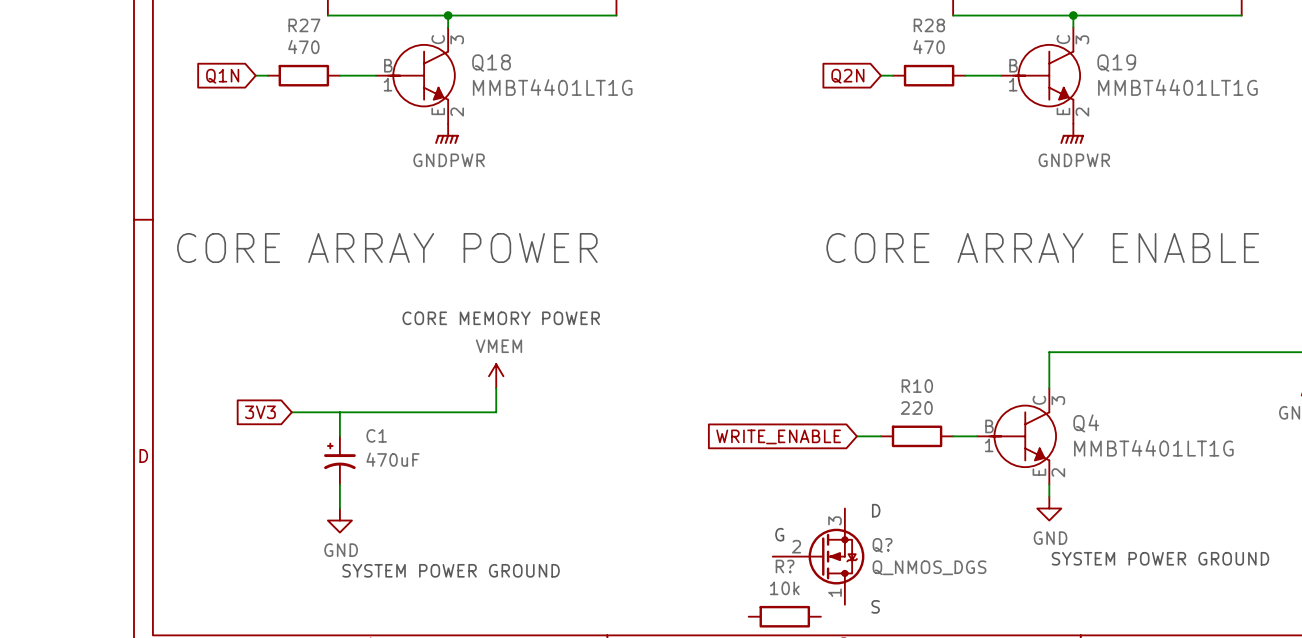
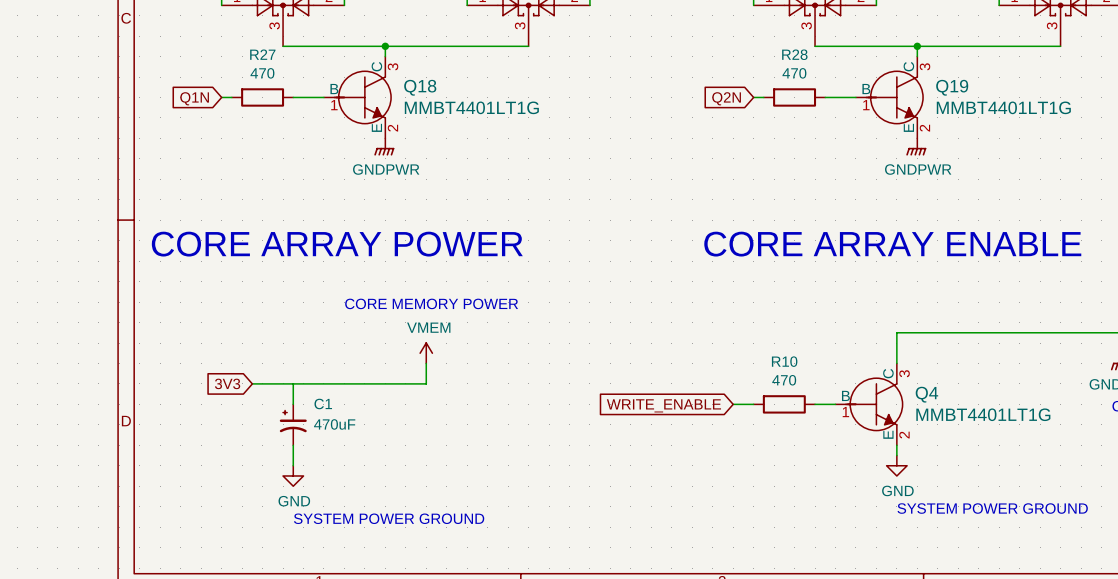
R10 value: 220 (916, 408) -> 470 (784, 380)
text: D (876, 510) -> none
text: G (779, 534) -> none
Q?: Q_NMOS_DGS (818, 556) -> none
text: S (875, 606) -> none
R?: 10k (784, 616) -> none

